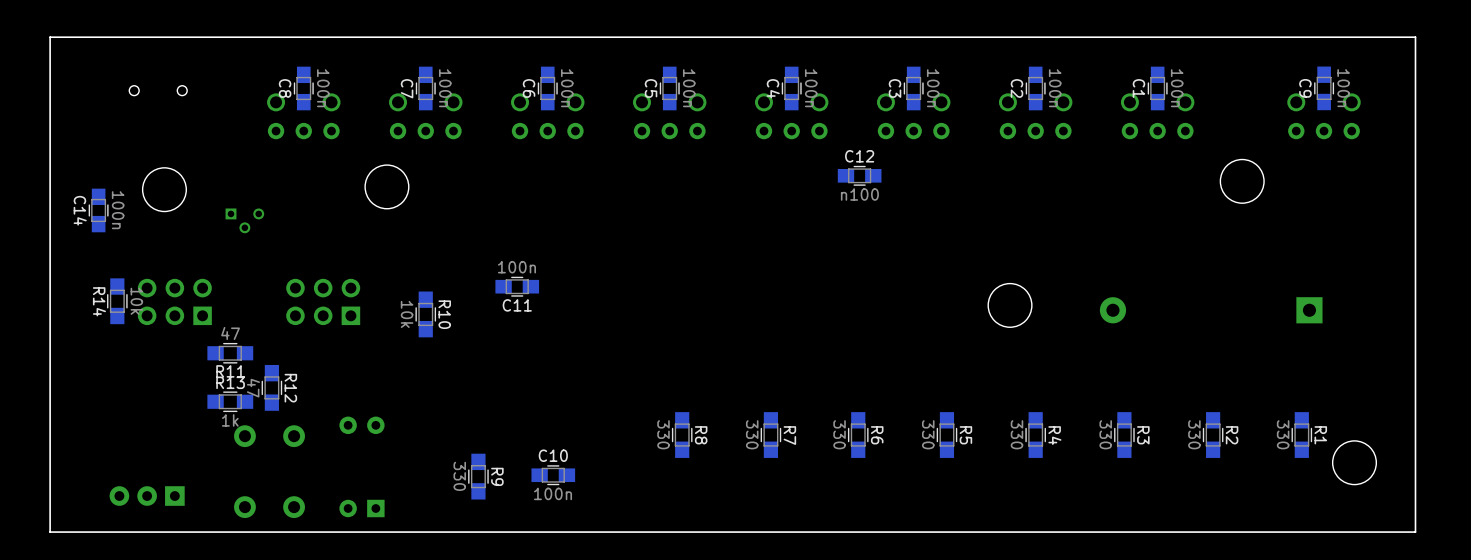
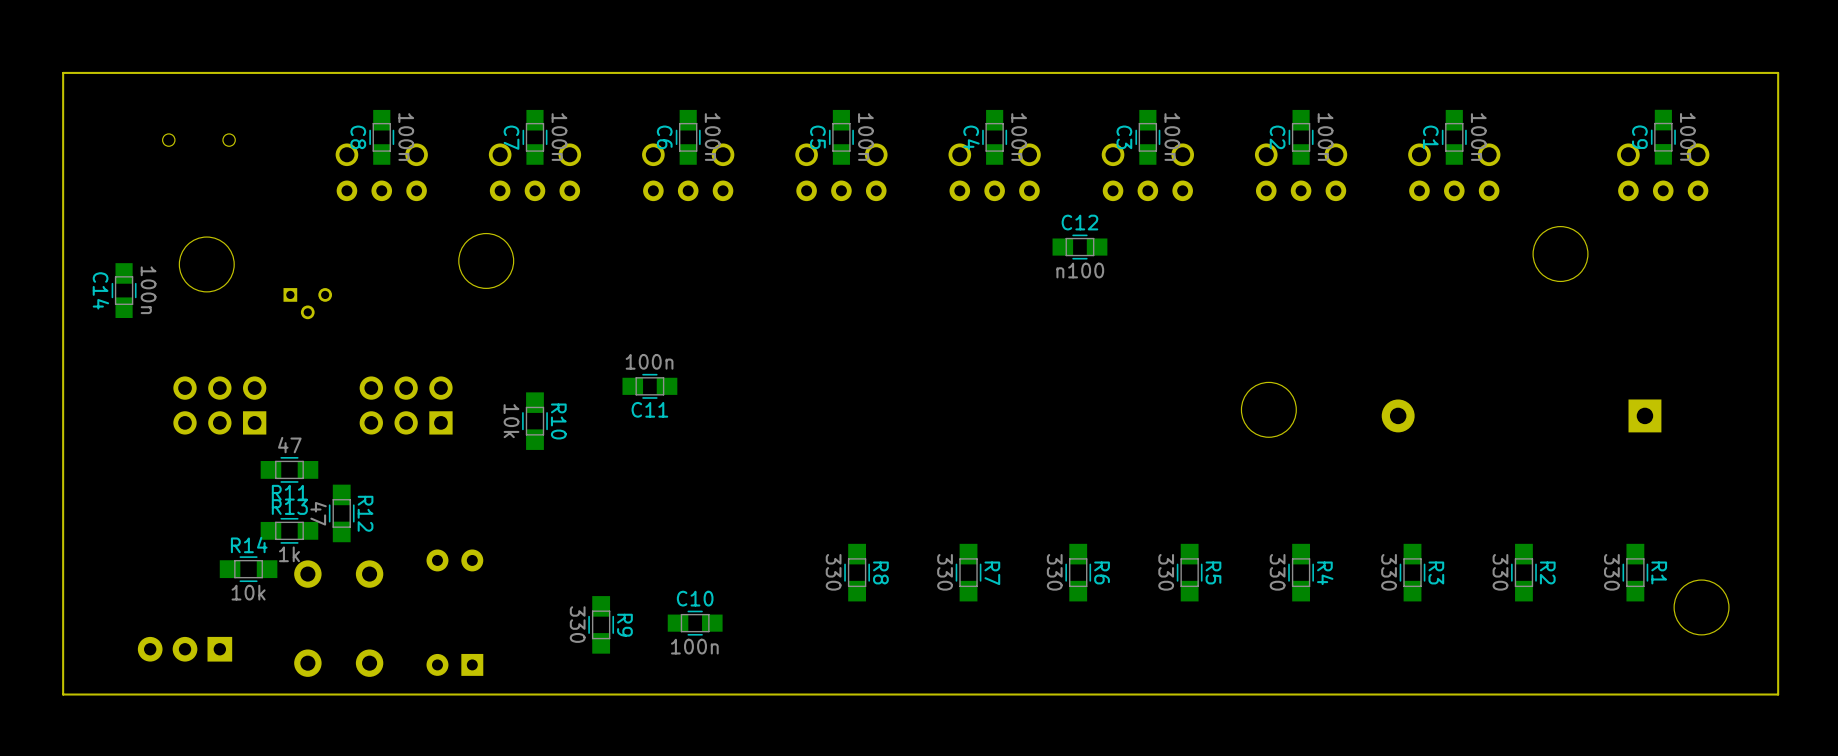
R14 rotation: 0° (117, 301) -> 90° clockwise (248, 569)
R14 position: (117, 301) -> (248, 569)

